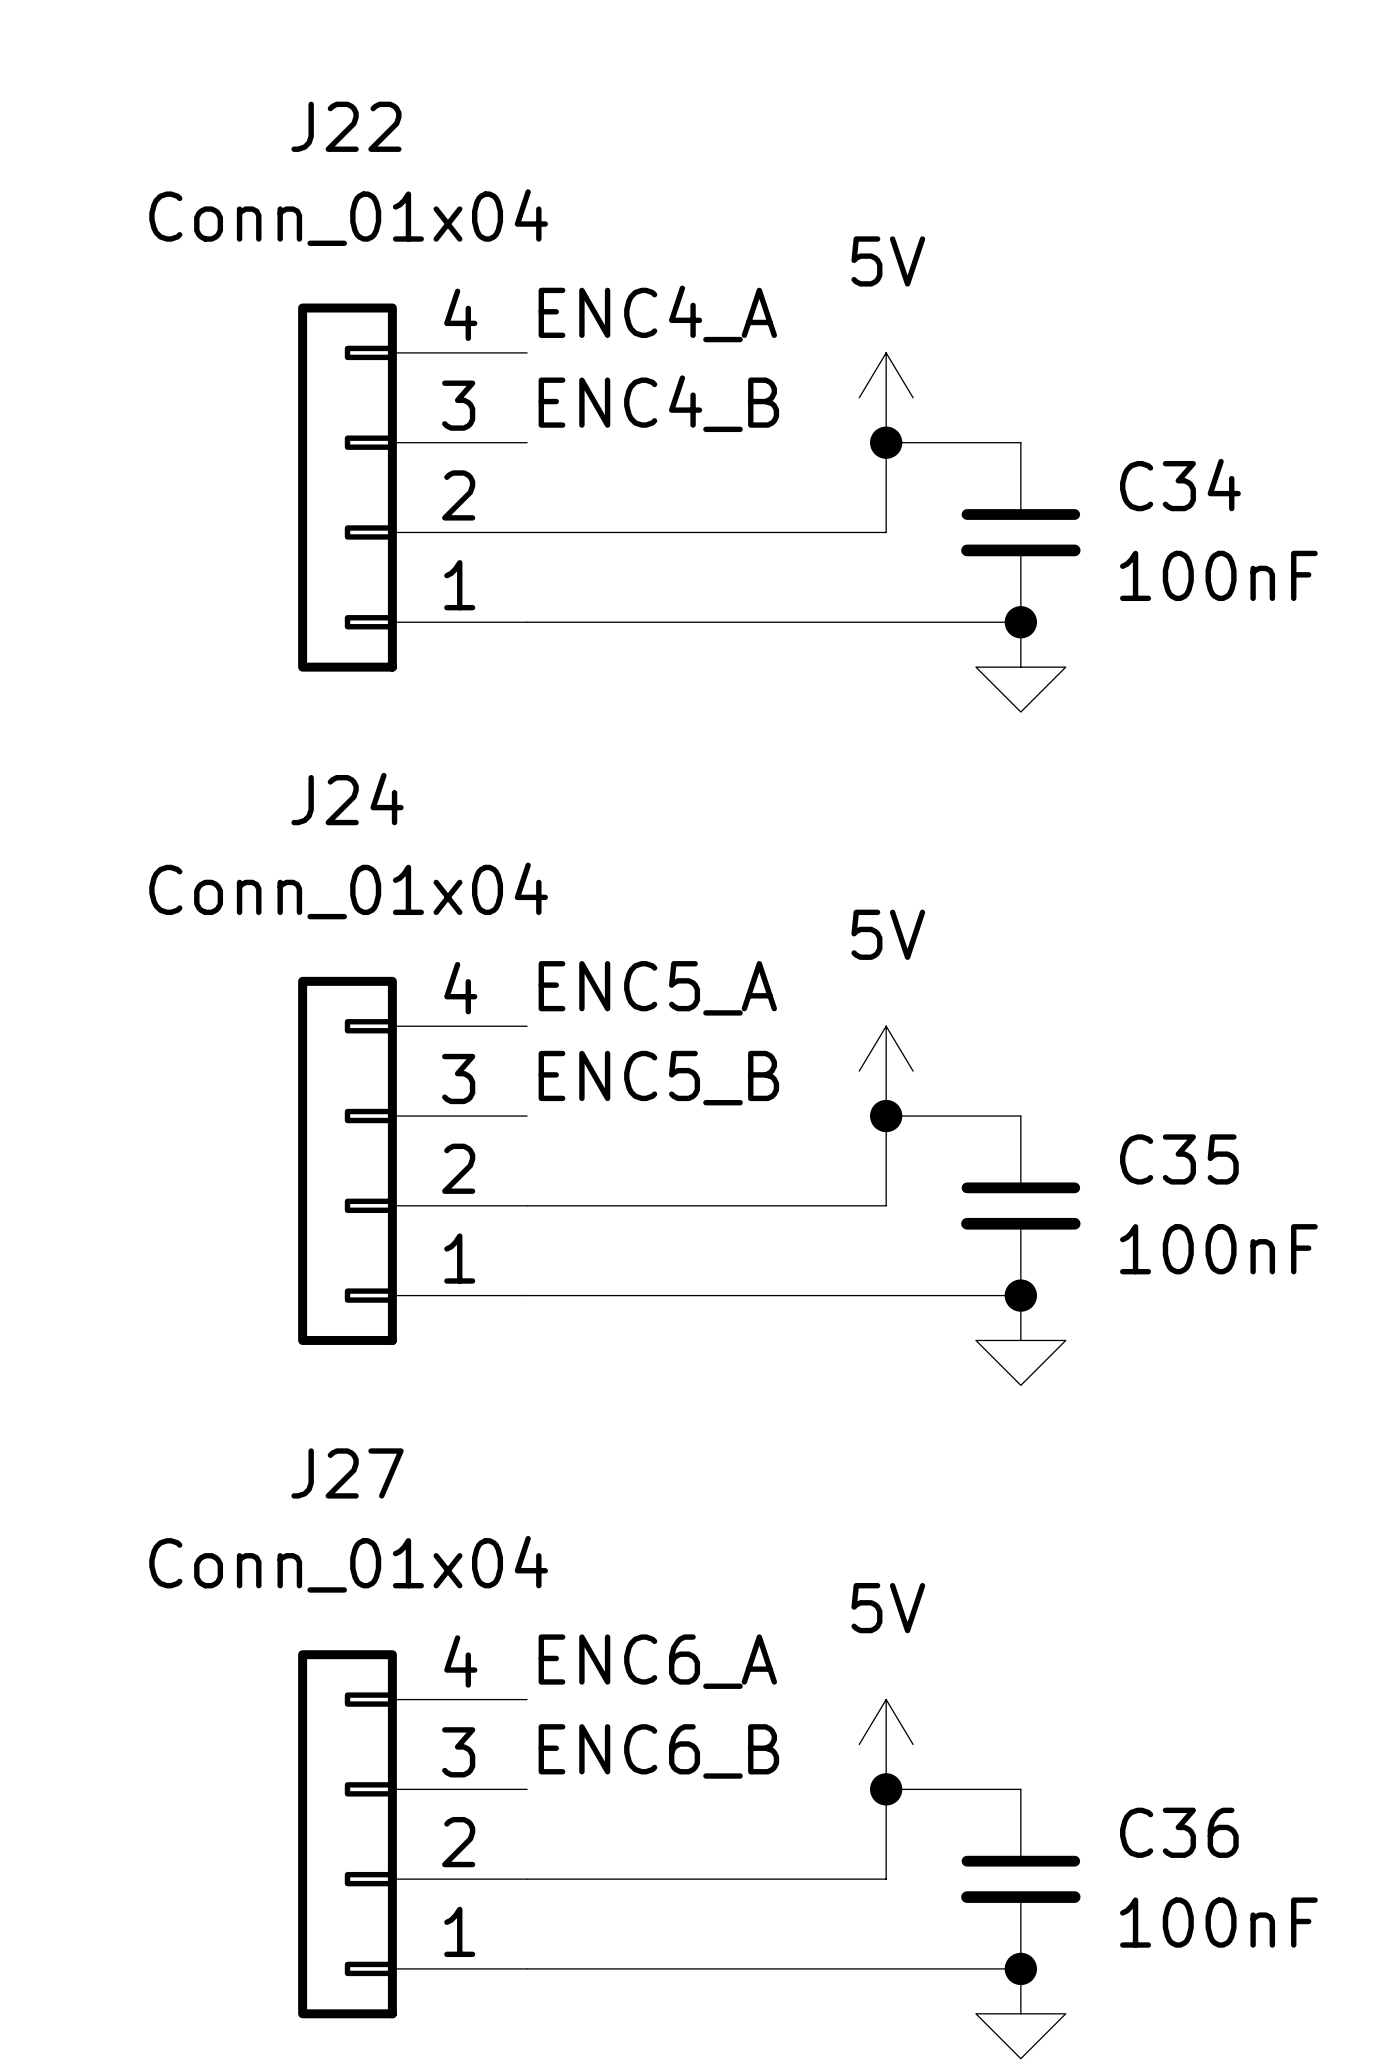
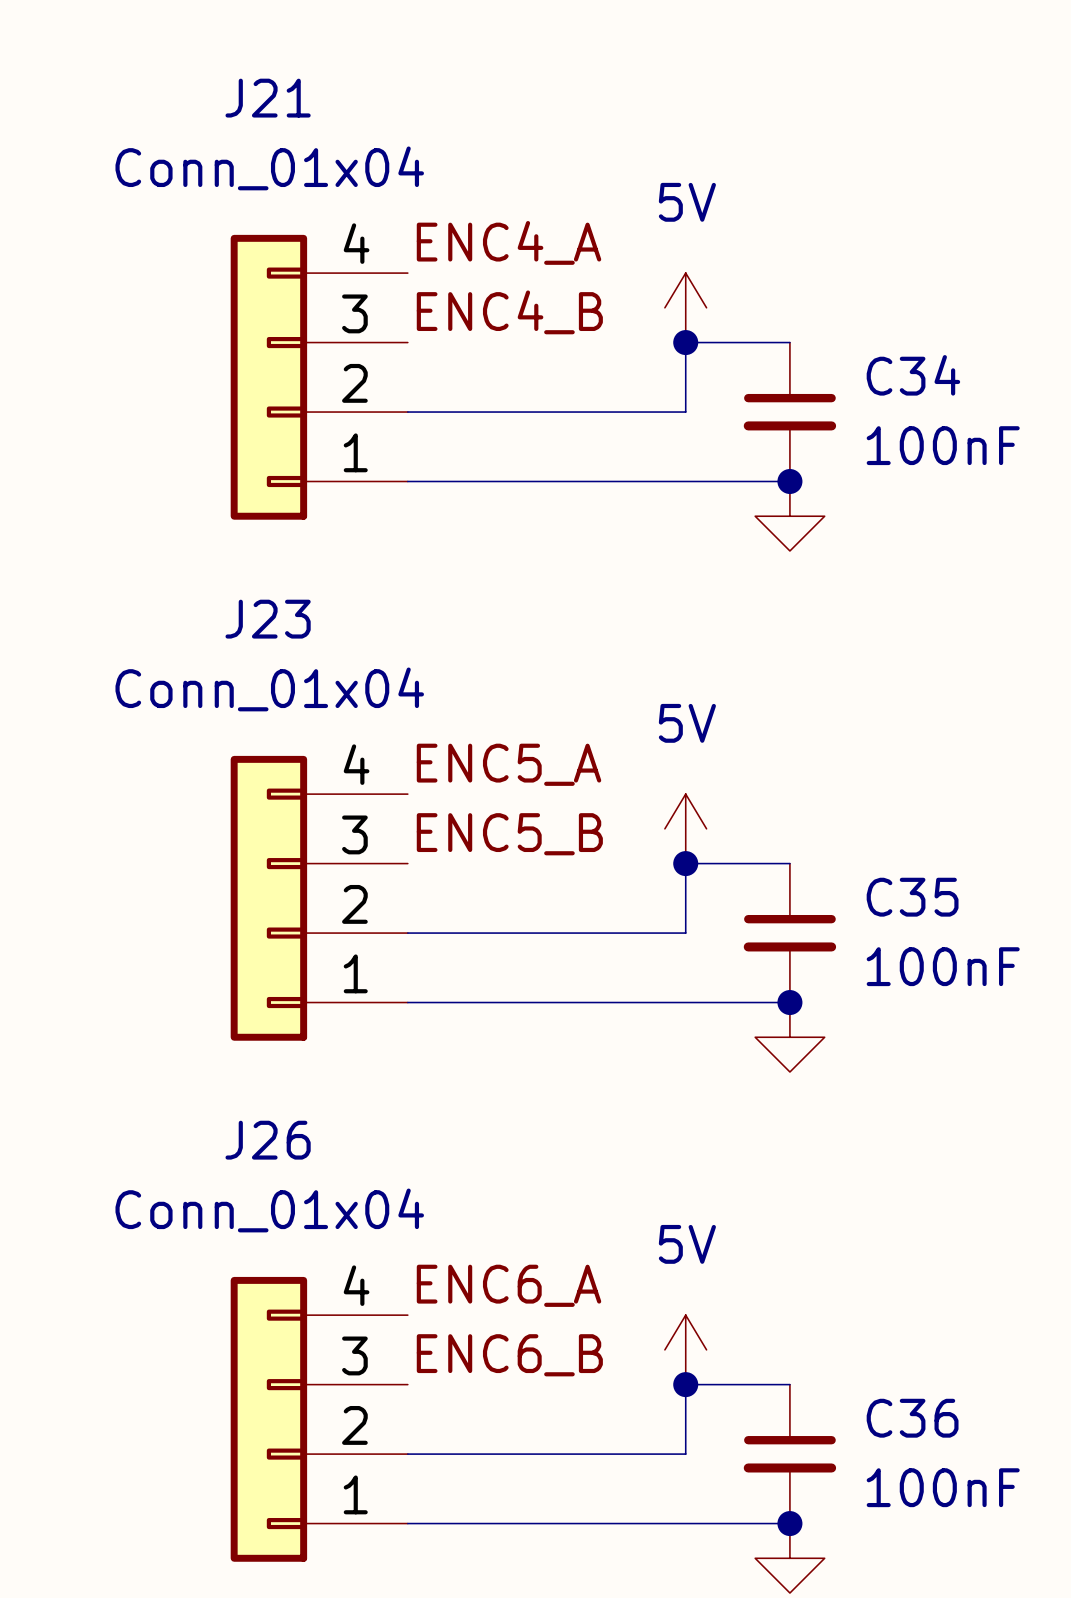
J22 name: J22 (346, 126) -> J21 (268, 98)
J24 name: J24 (347, 799) -> J23 (268, 619)
J27 name: J27 (347, 1473) -> J26 (268, 1140)

